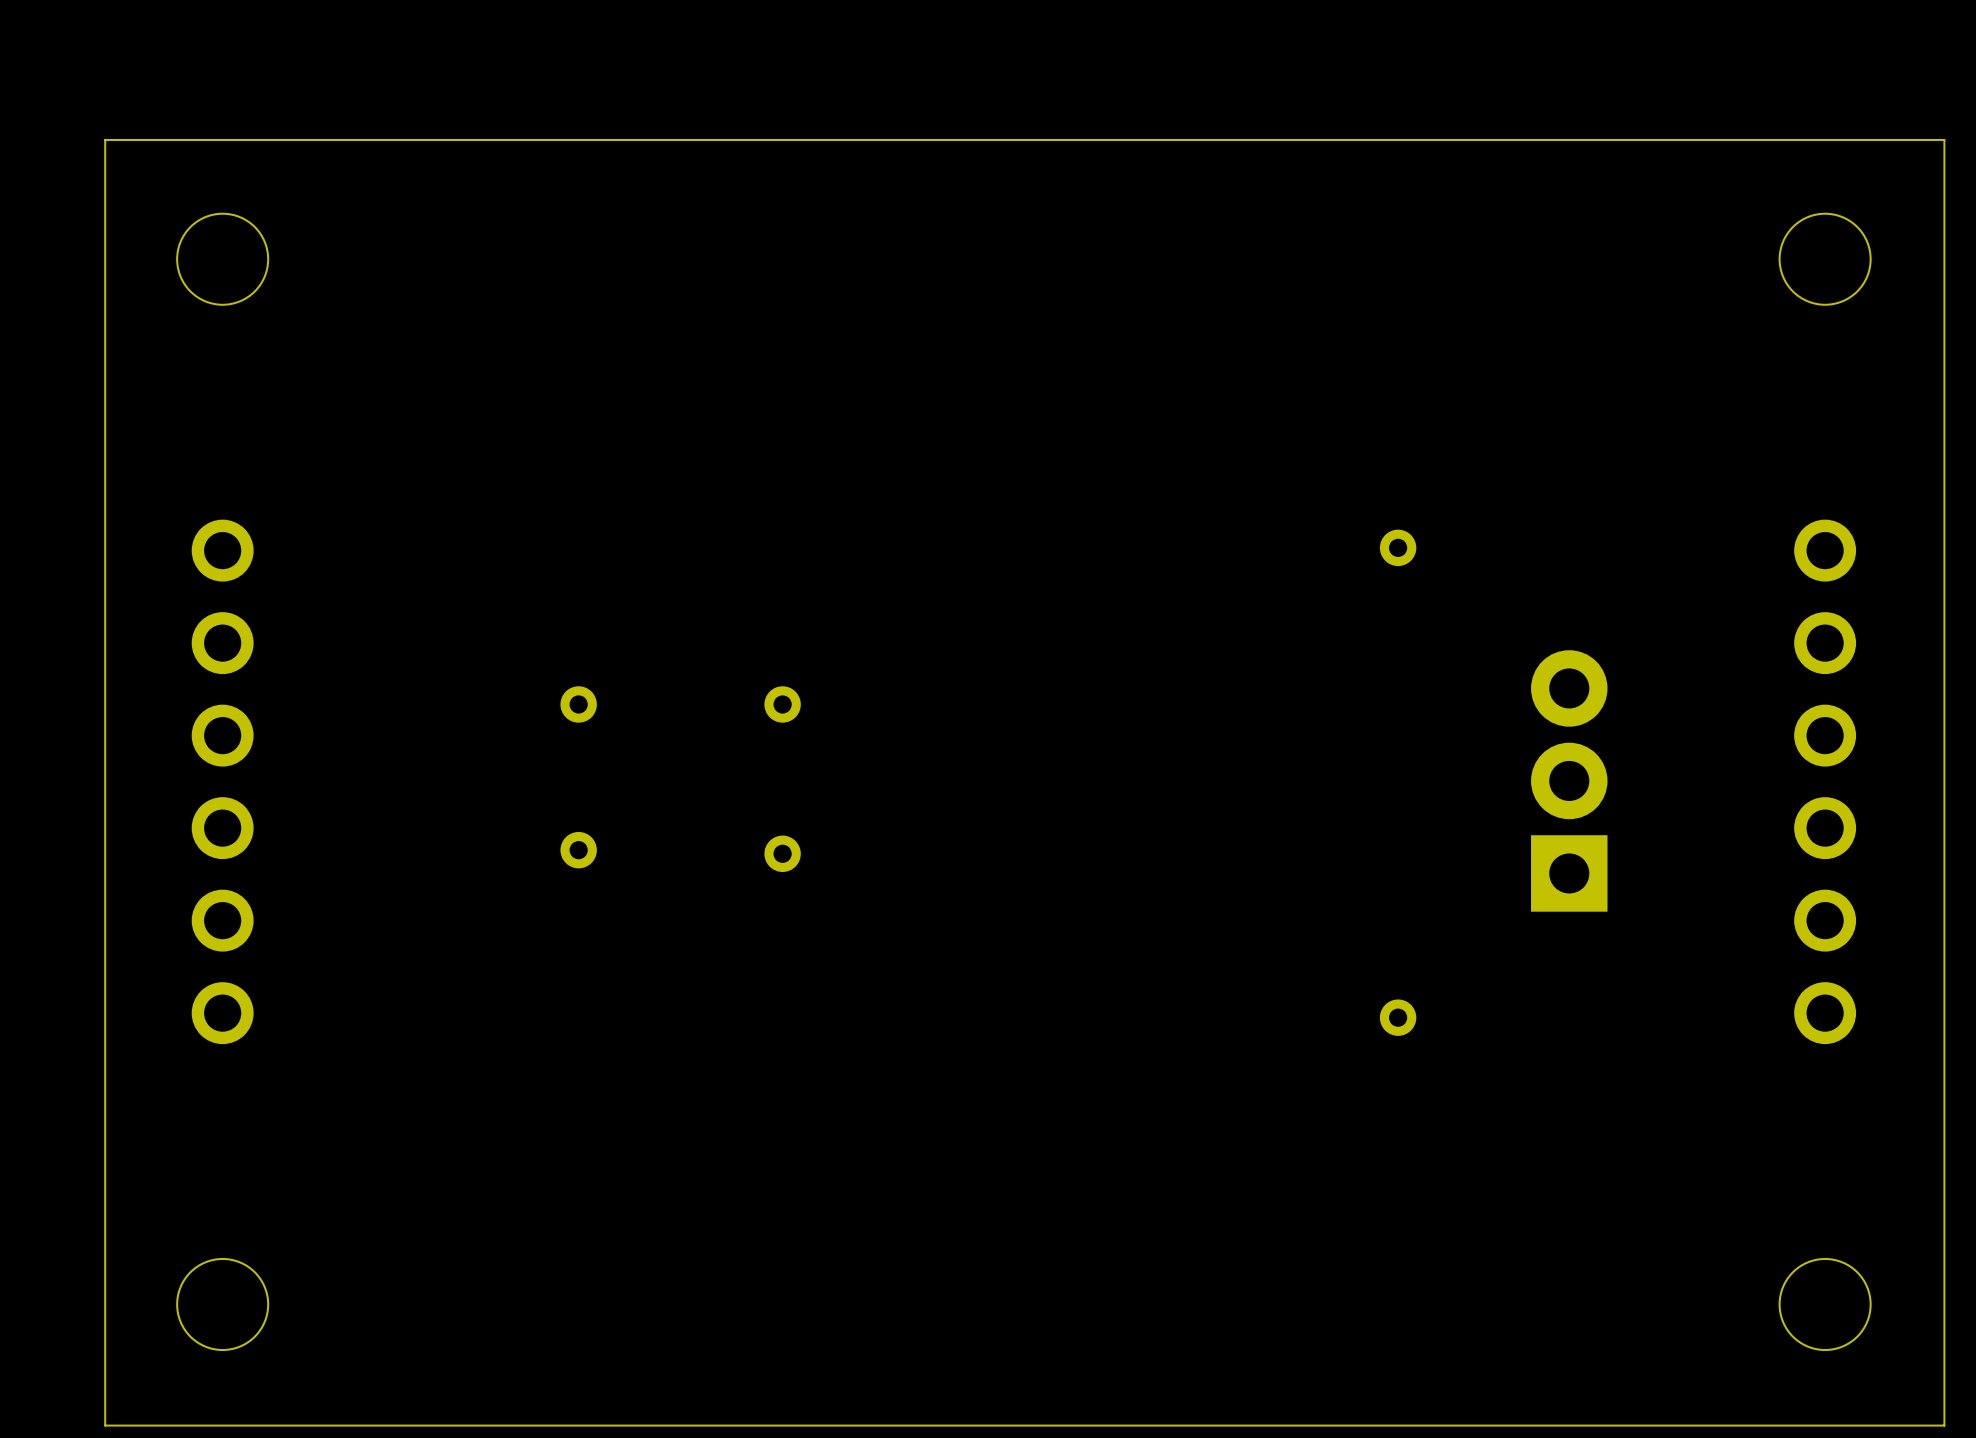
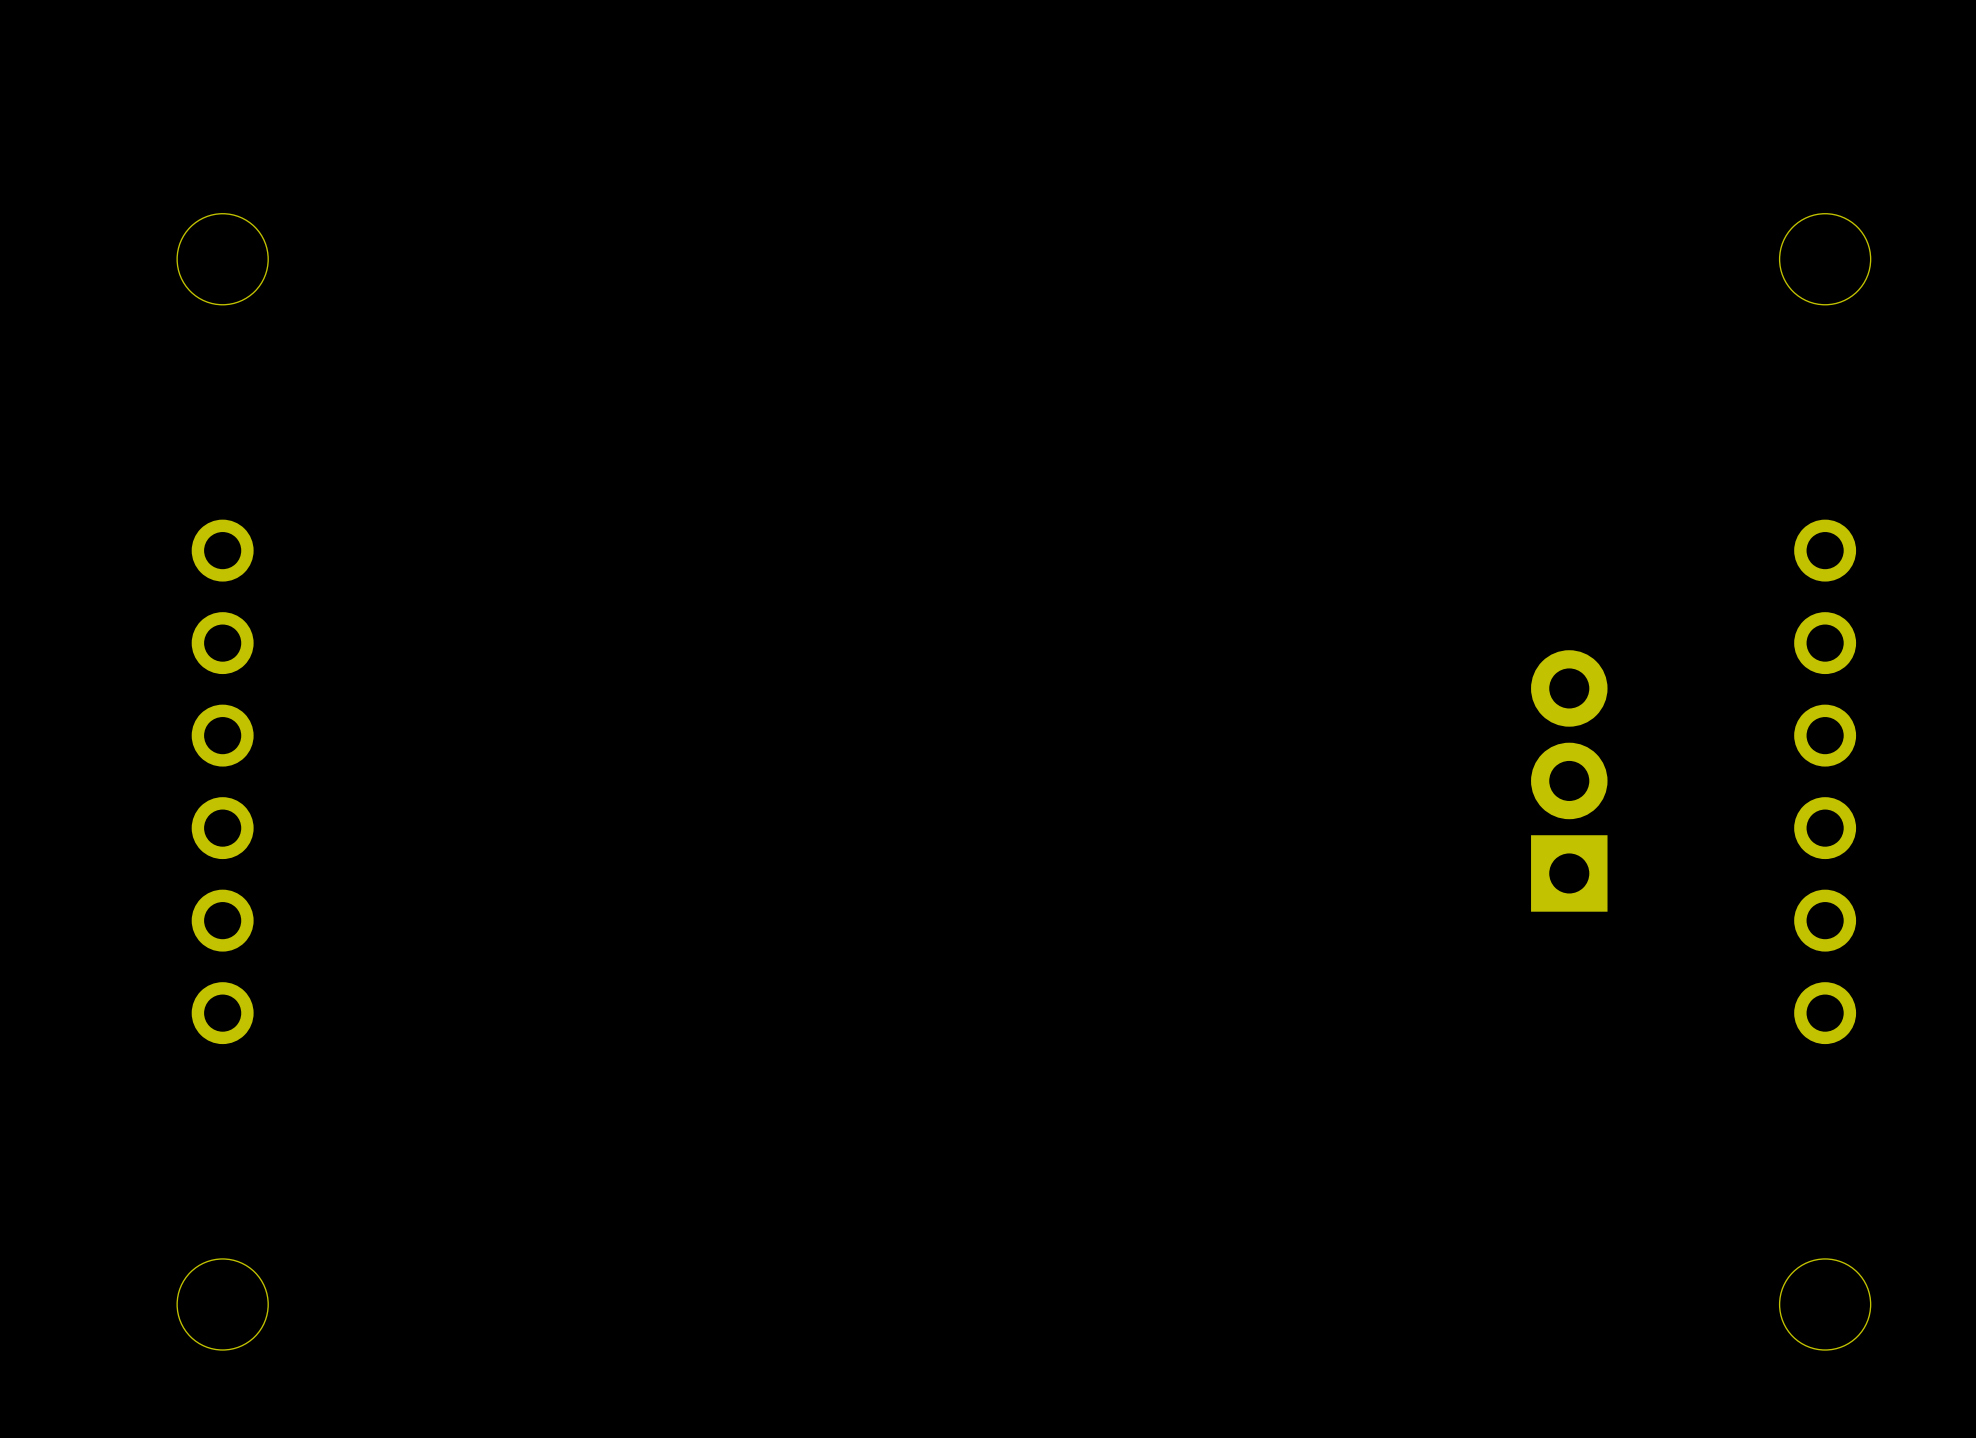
board edge: (1944, 139) (1944, 1425) (105, 1425) (105, 139) (1944, 139) -> none
part: (1398, 547) -> none
part: (578, 704) -> none
part: (782, 704) -> none
part: (578, 850) -> none
part: (782, 853) -> none
part: (1398, 1017) -> none

